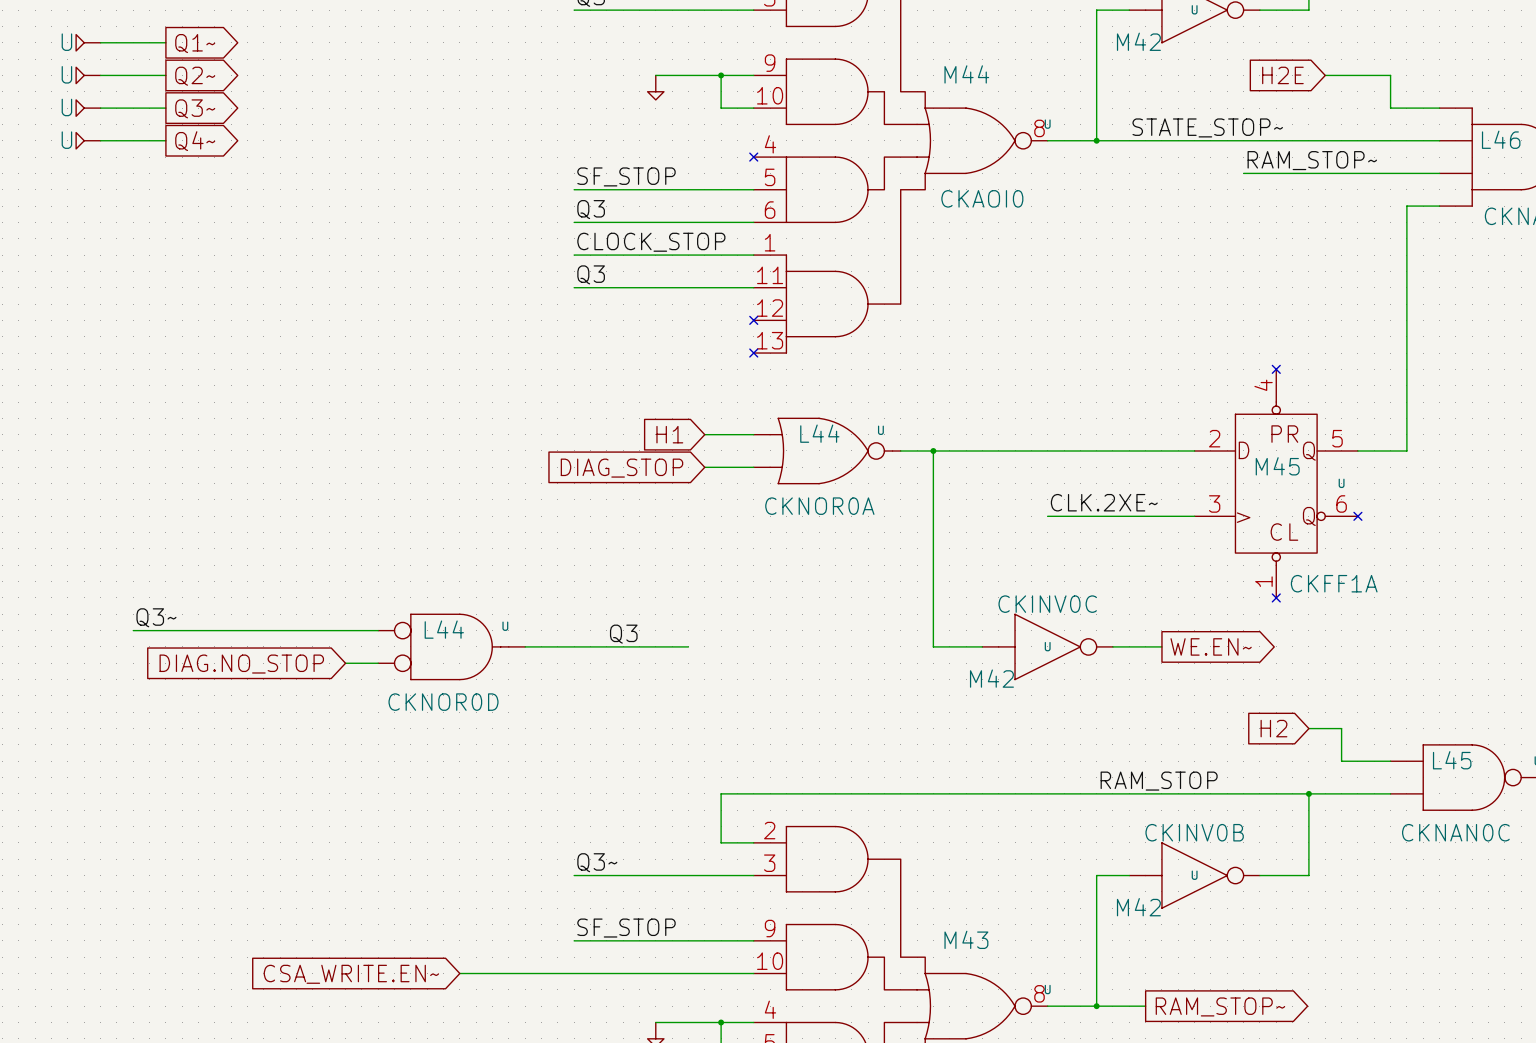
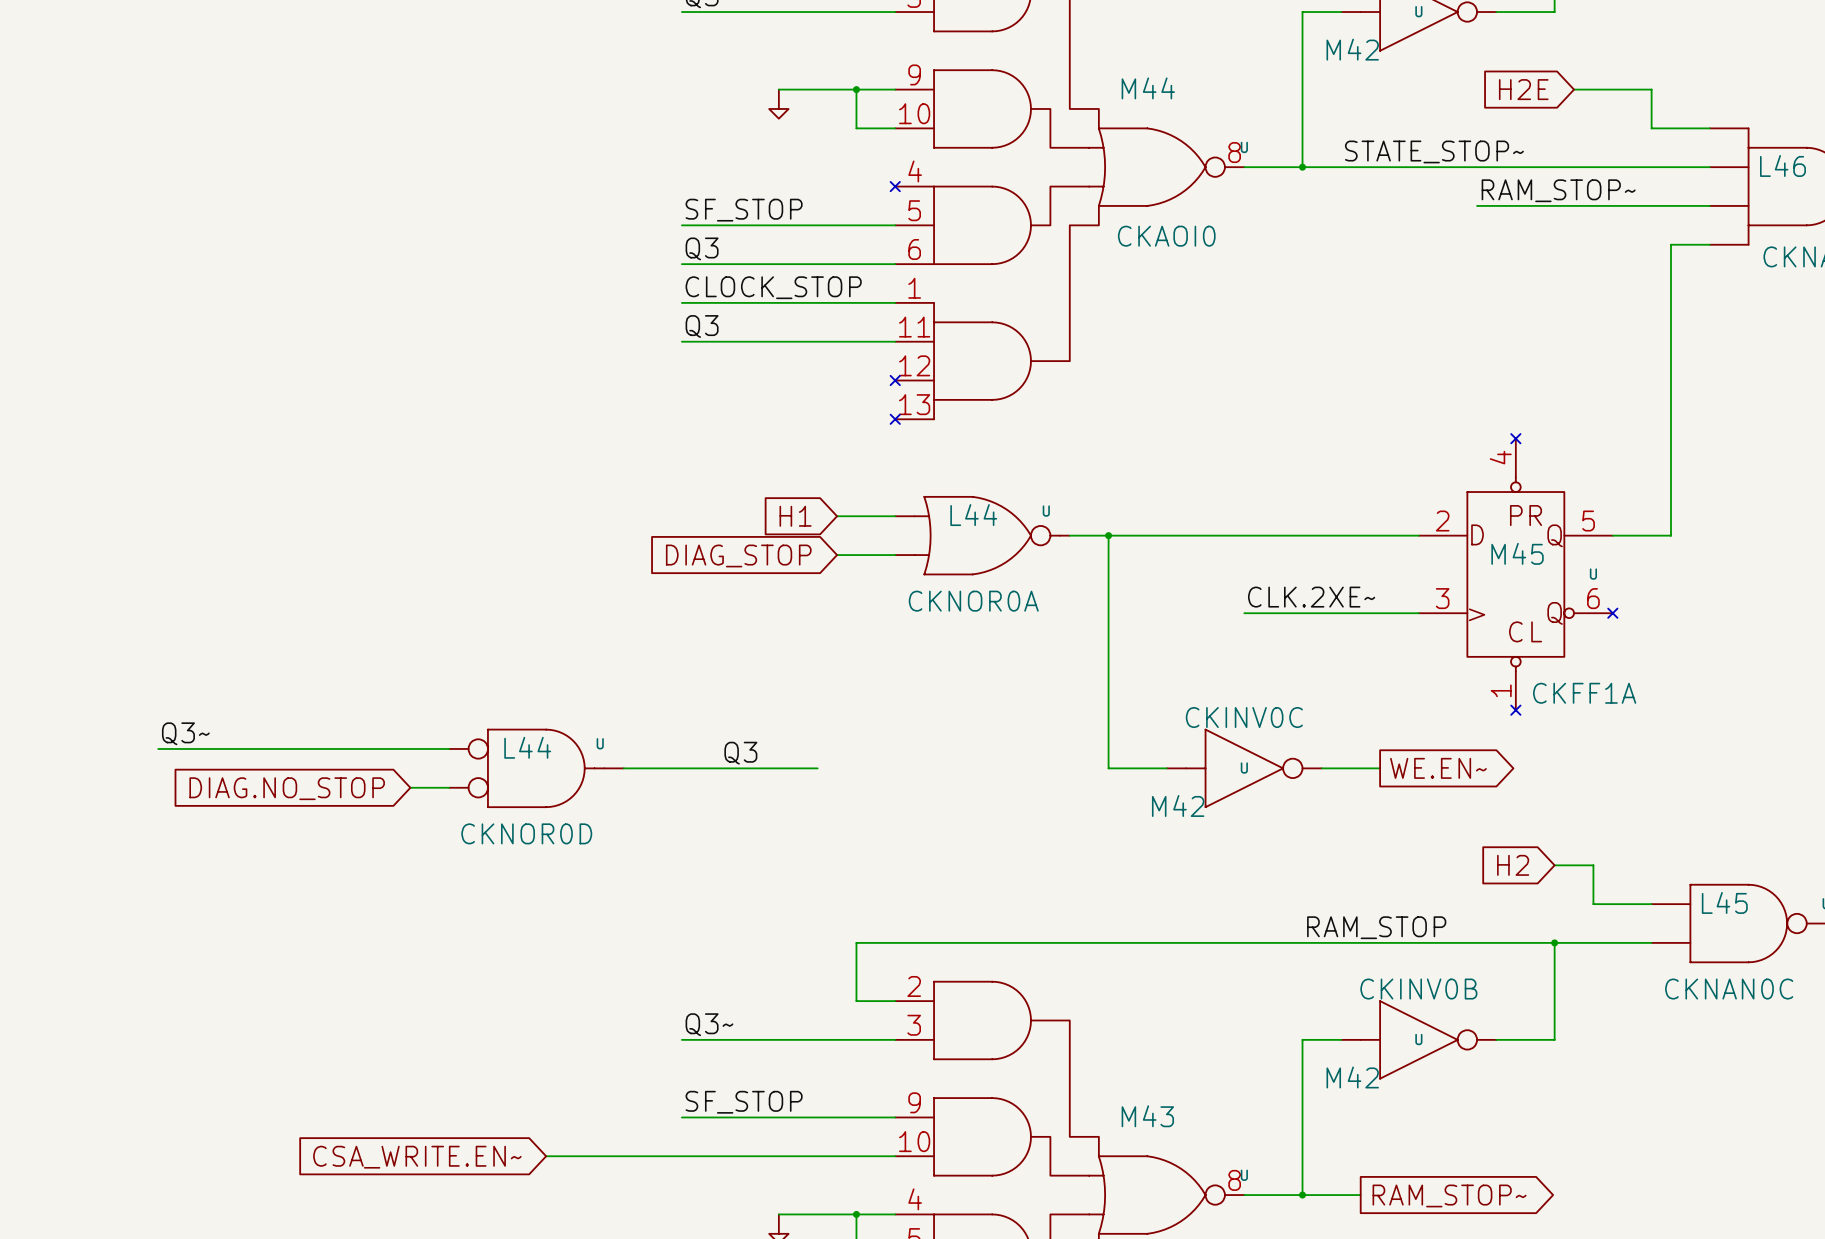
U: (88, 42) -> none
wire: (100, 42) (165, 42) -> none
global label: Q1~ (195, 43) -> none
U: (88, 75) -> none
wire: (100, 75) (165, 75) -> none
global label: Q2~ (195, 76) -> none
U: (88, 108) -> none
wire: (100, 108) (165, 108) -> none
global label: Q3~ (195, 108) -> none
U: (88, 140) -> none
wire: (100, 140) (165, 140) -> none
global label: Q4~ (195, 141) -> none

